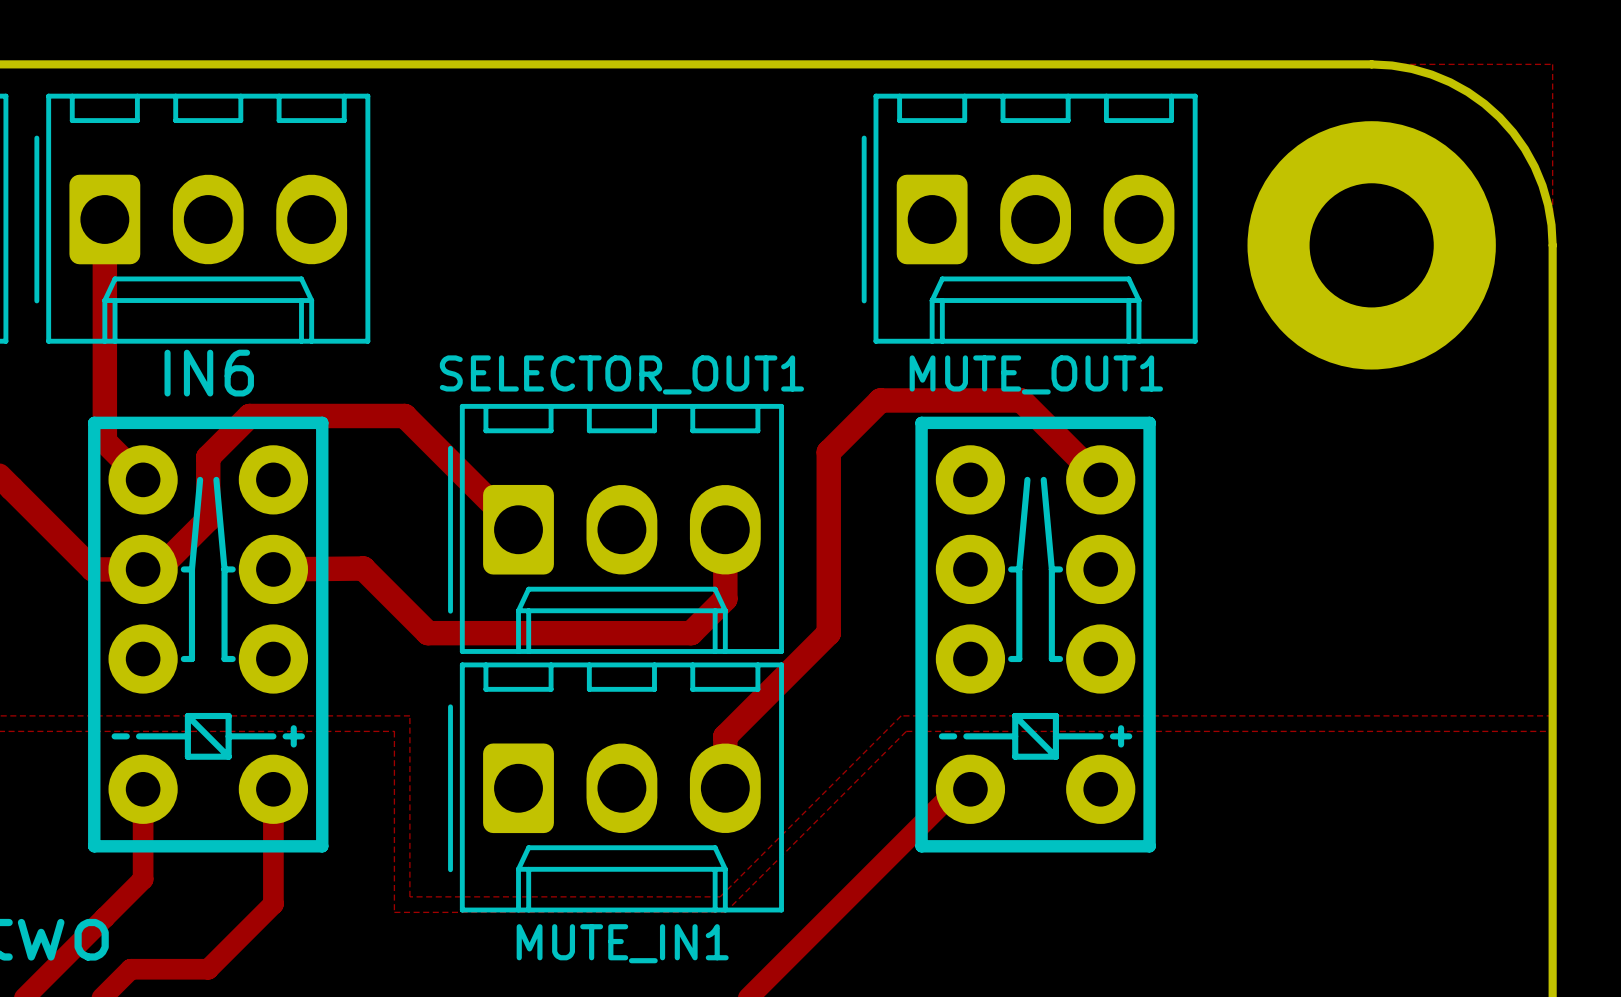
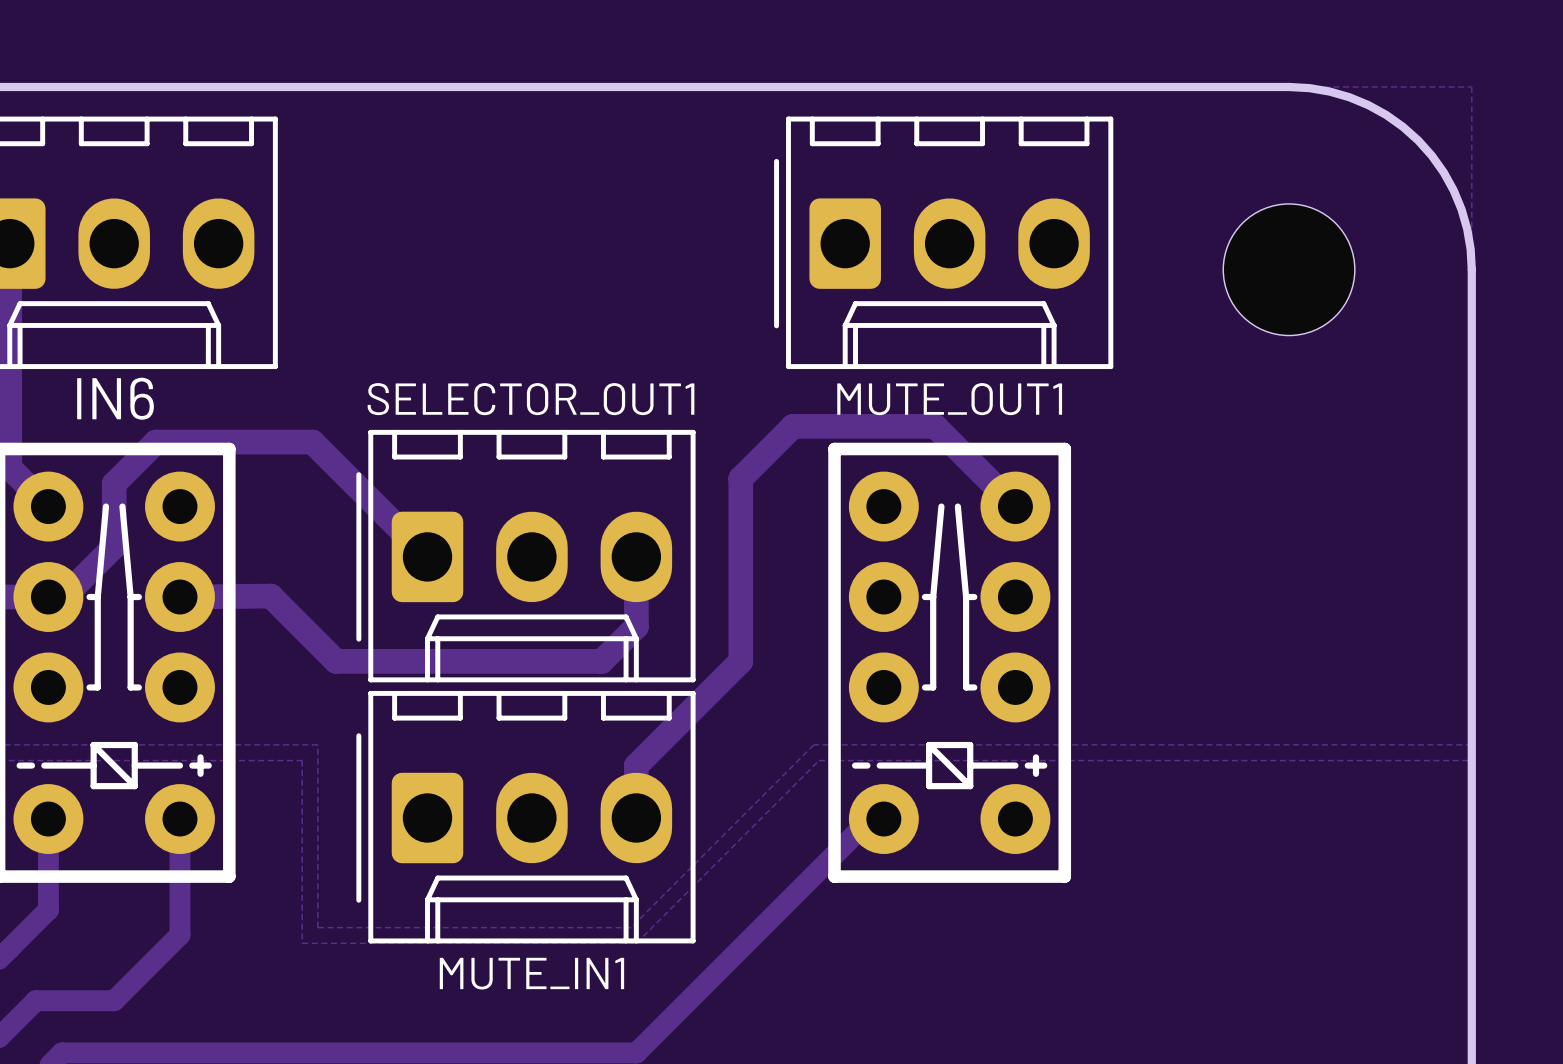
part footprint: [1247, 121, 1496, 370] -> [1223, 203, 1355, 336]

